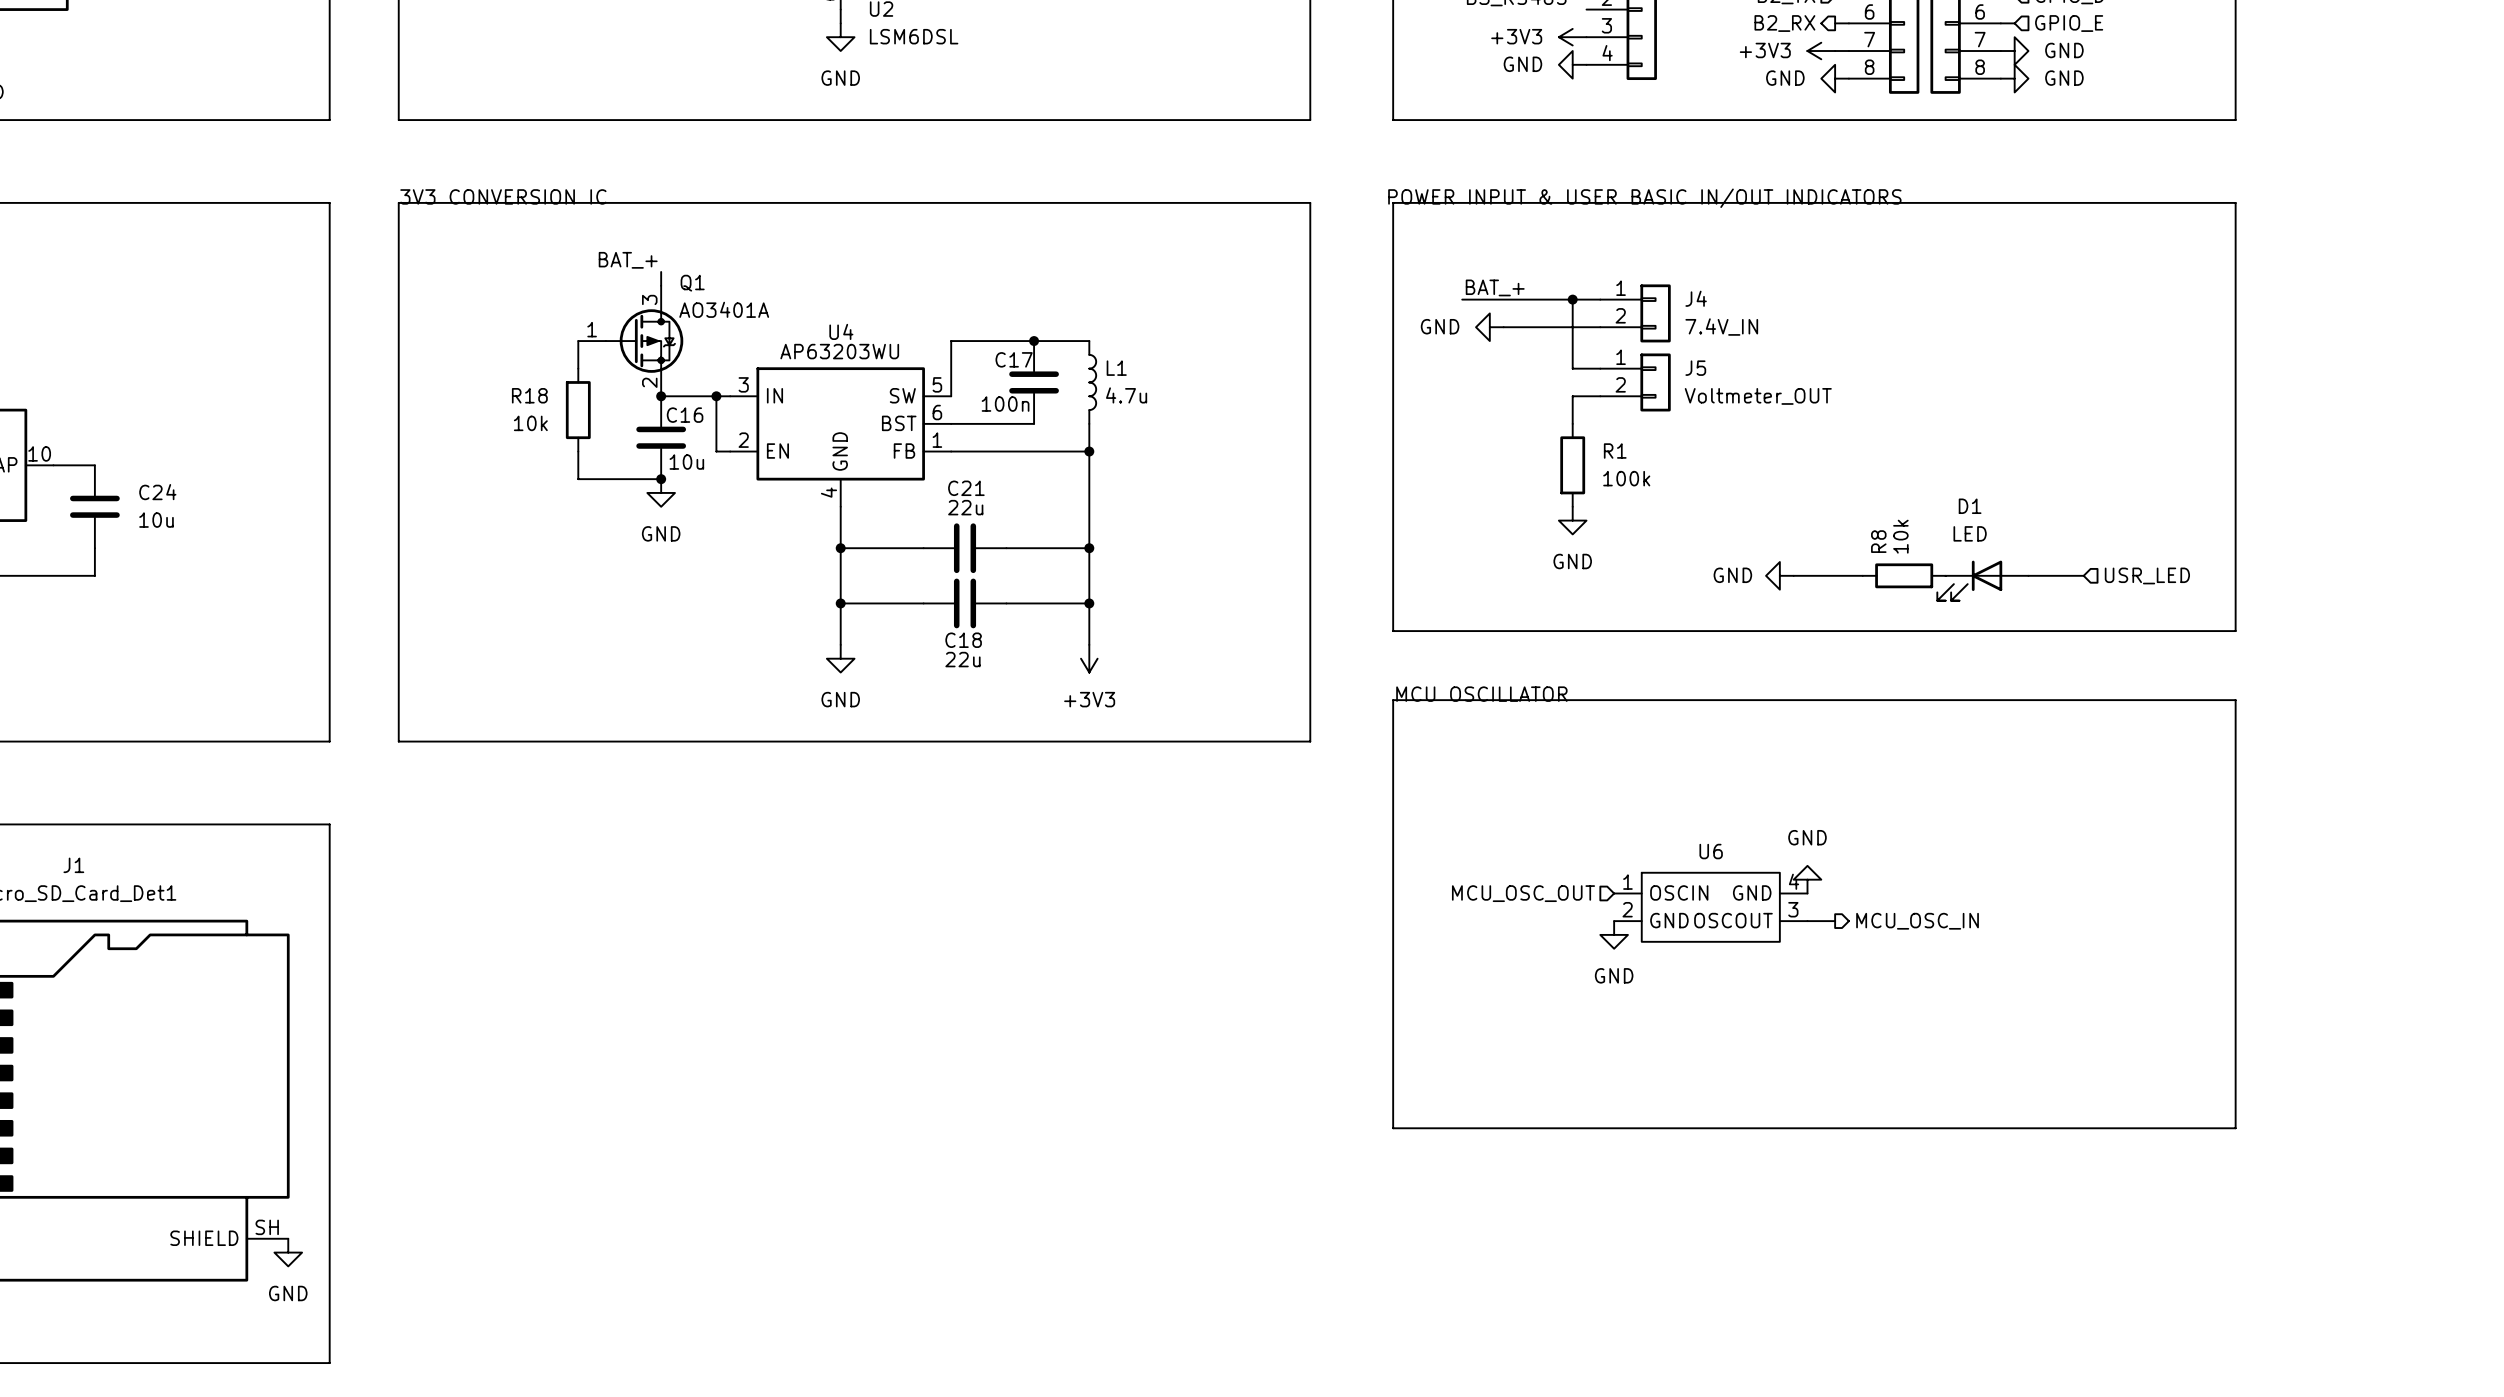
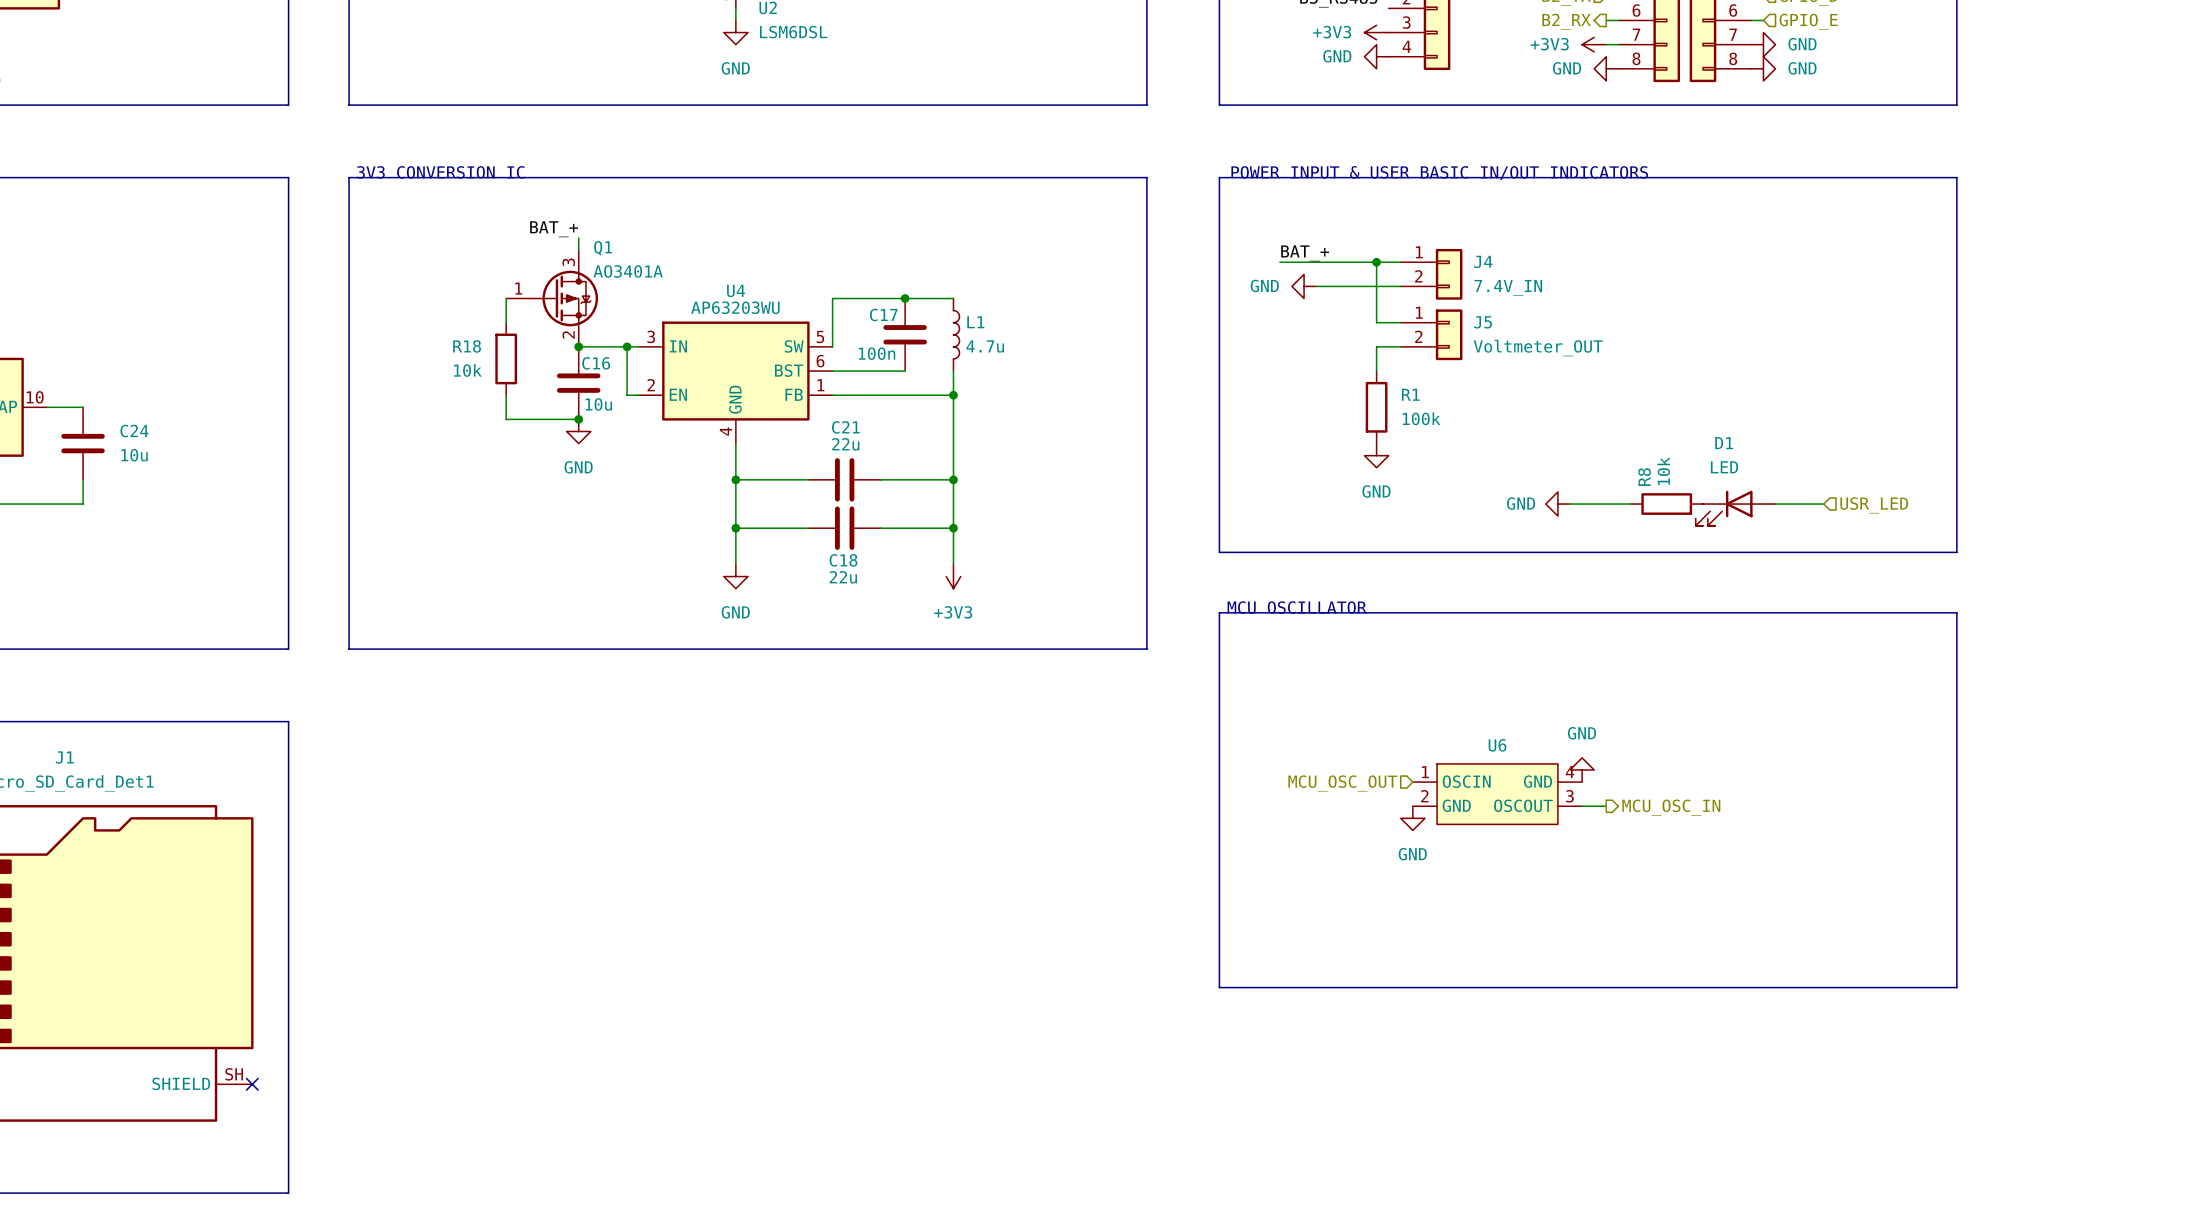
no-connect mark: none -> (252, 1084)
power symbol: GND (288, 1252) -> none

